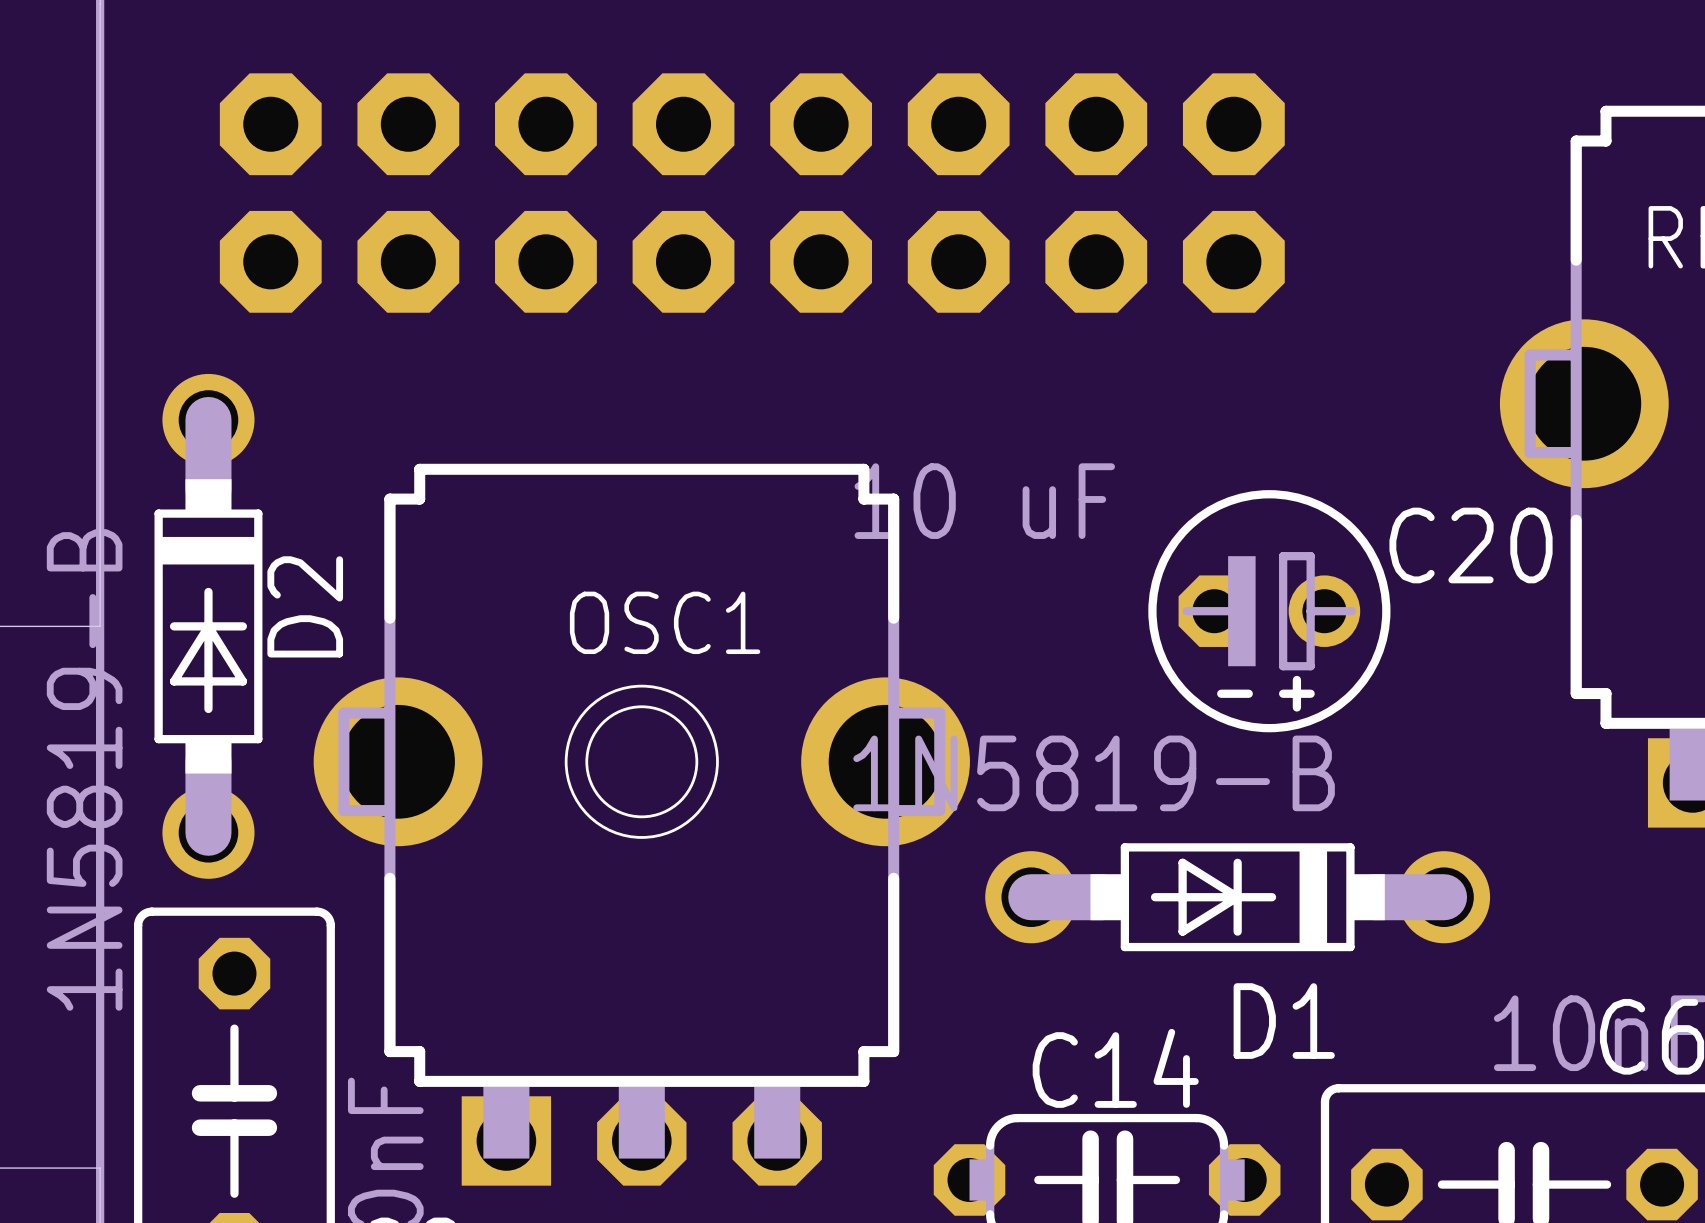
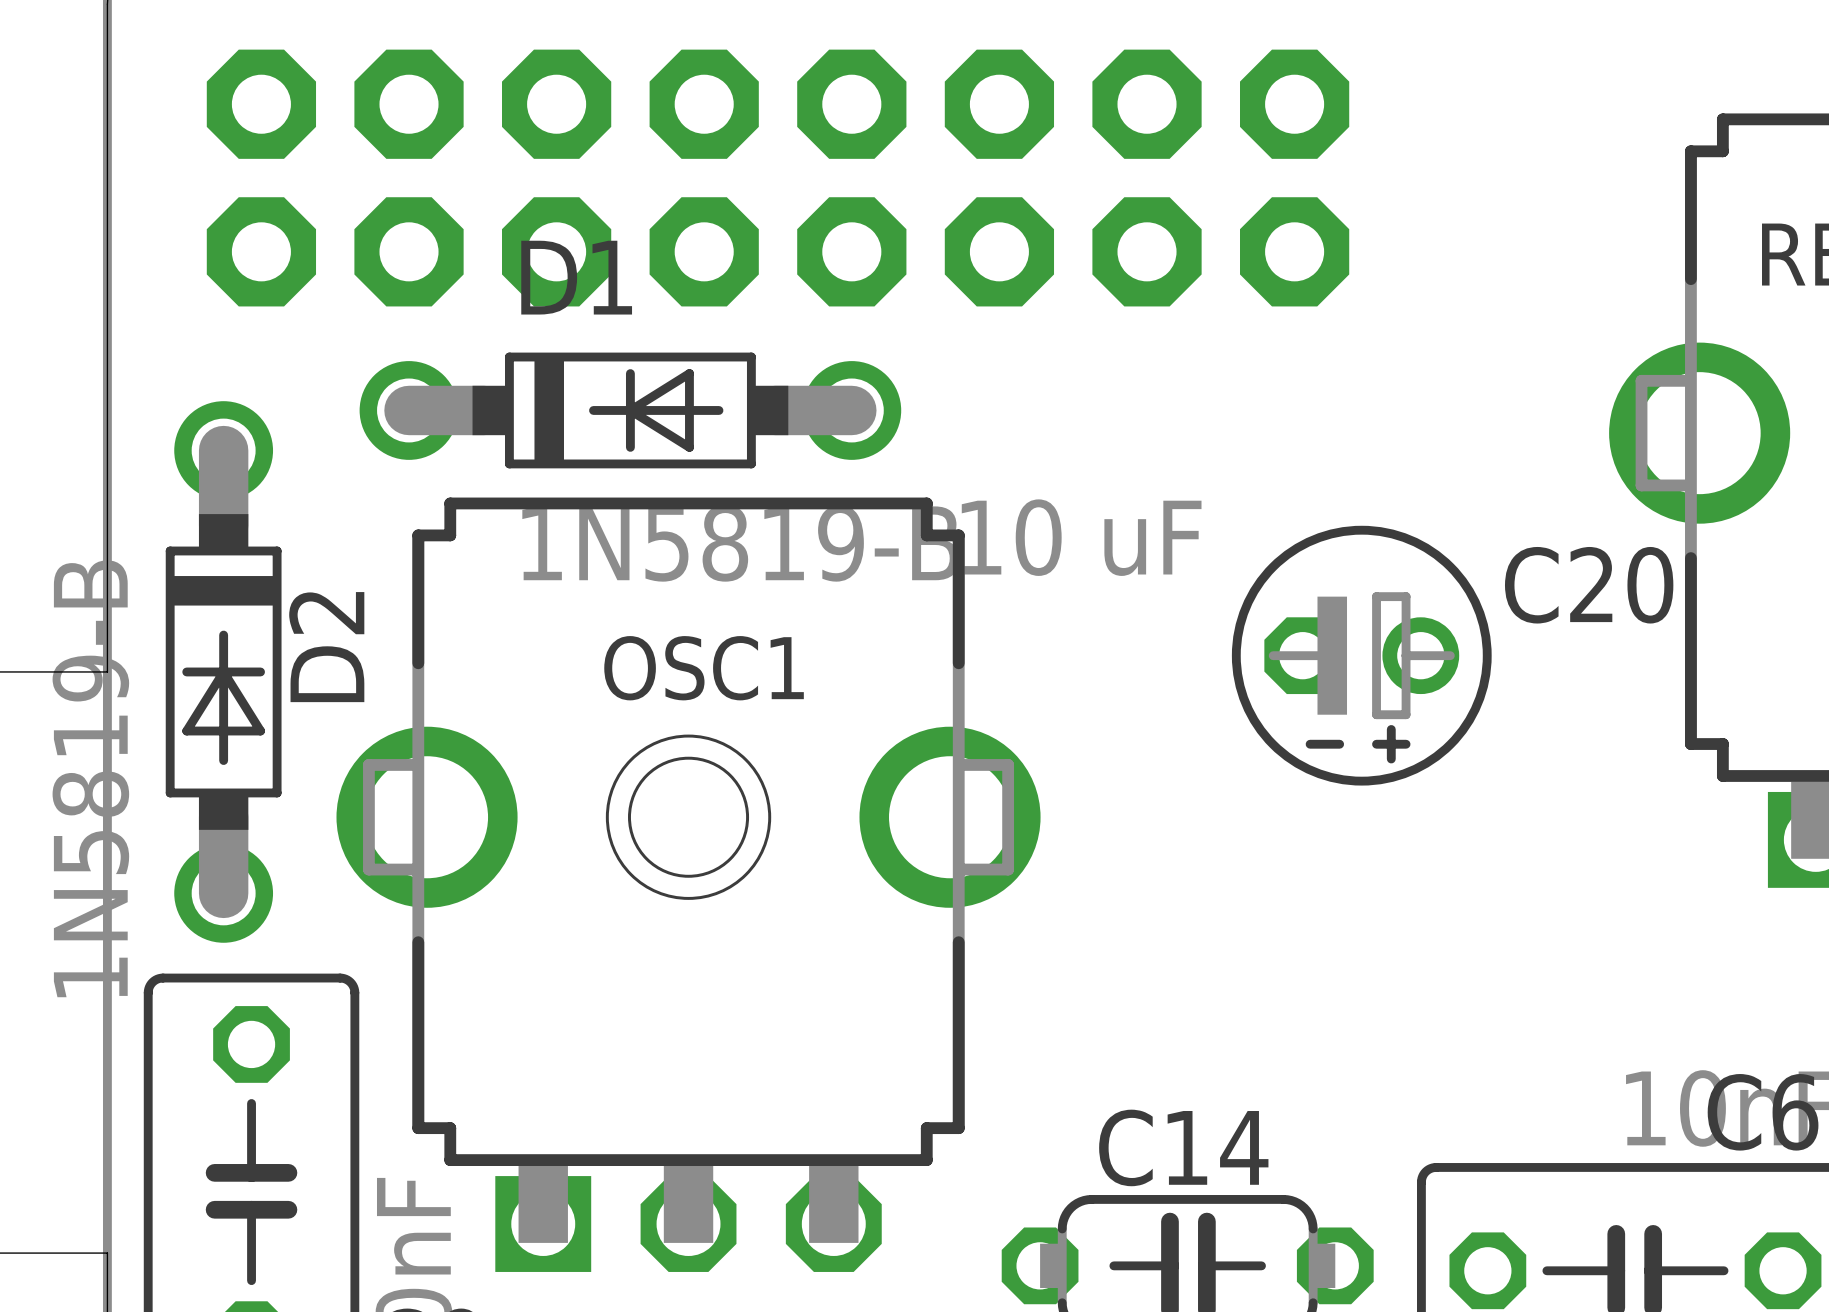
part position: (752, 193) -> (778, 178)
D1 rotation: 0° (1237, 897) -> 180° (630, 410)
D1 position: (1237, 897) -> (630, 410)

